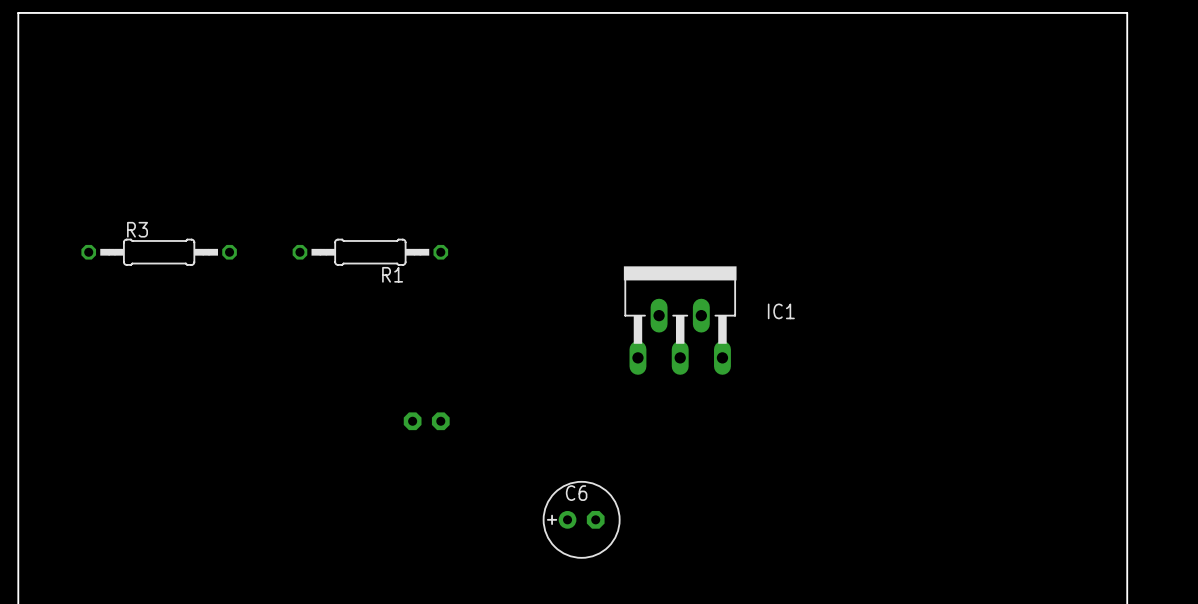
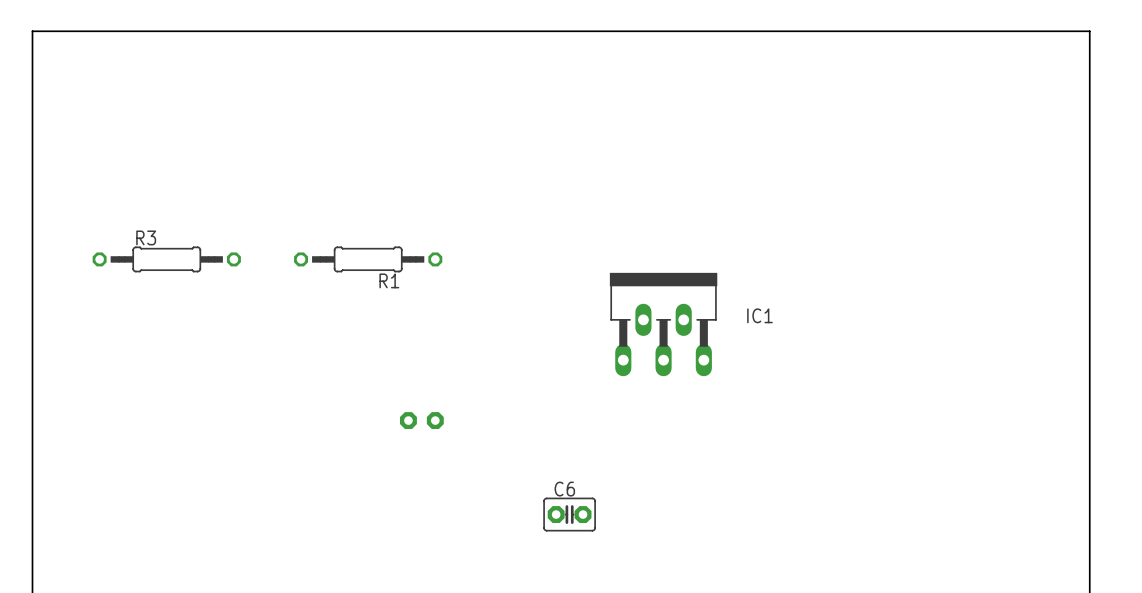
C6 footprint: [542, 480, 621, 559] -> [543, 497, 596, 532]

